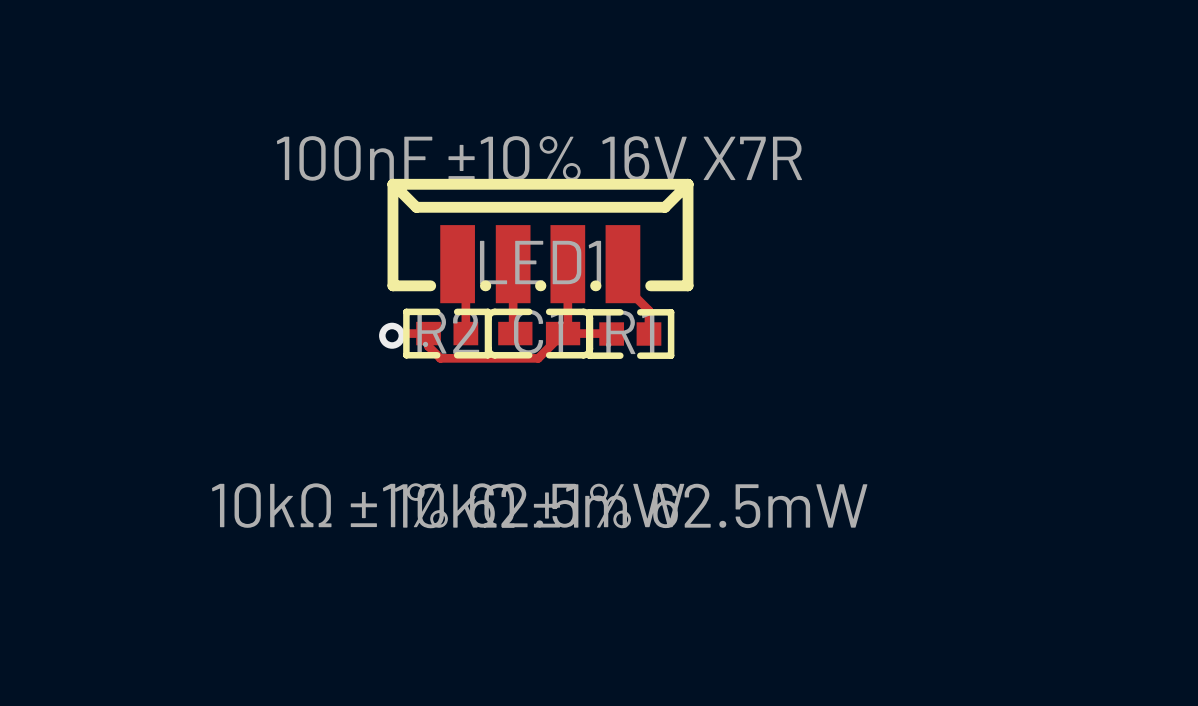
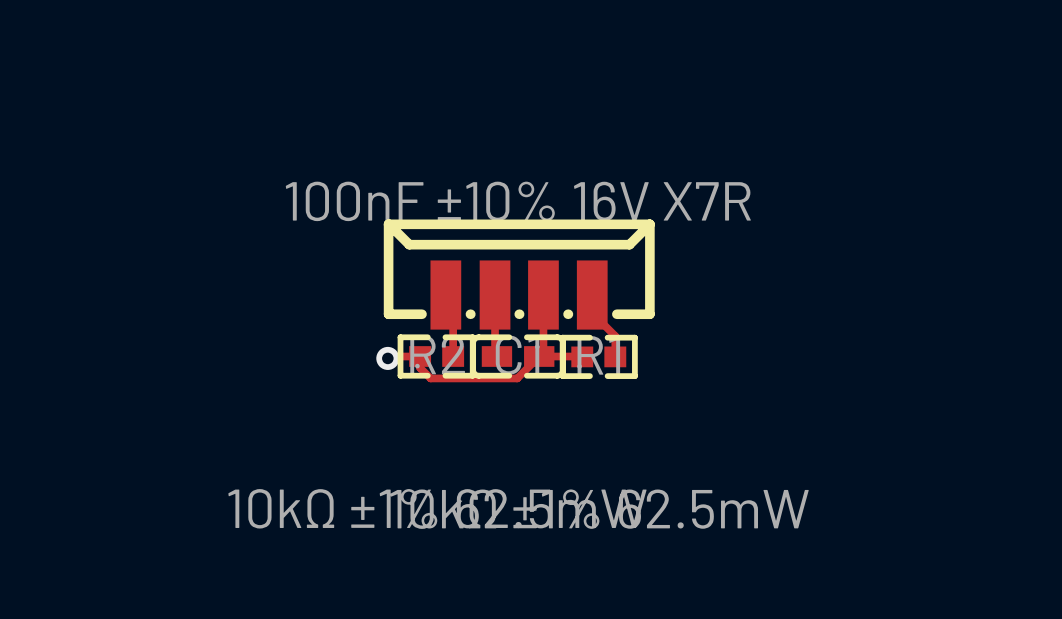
LED1 name: LED1 (540, 262) -> none

